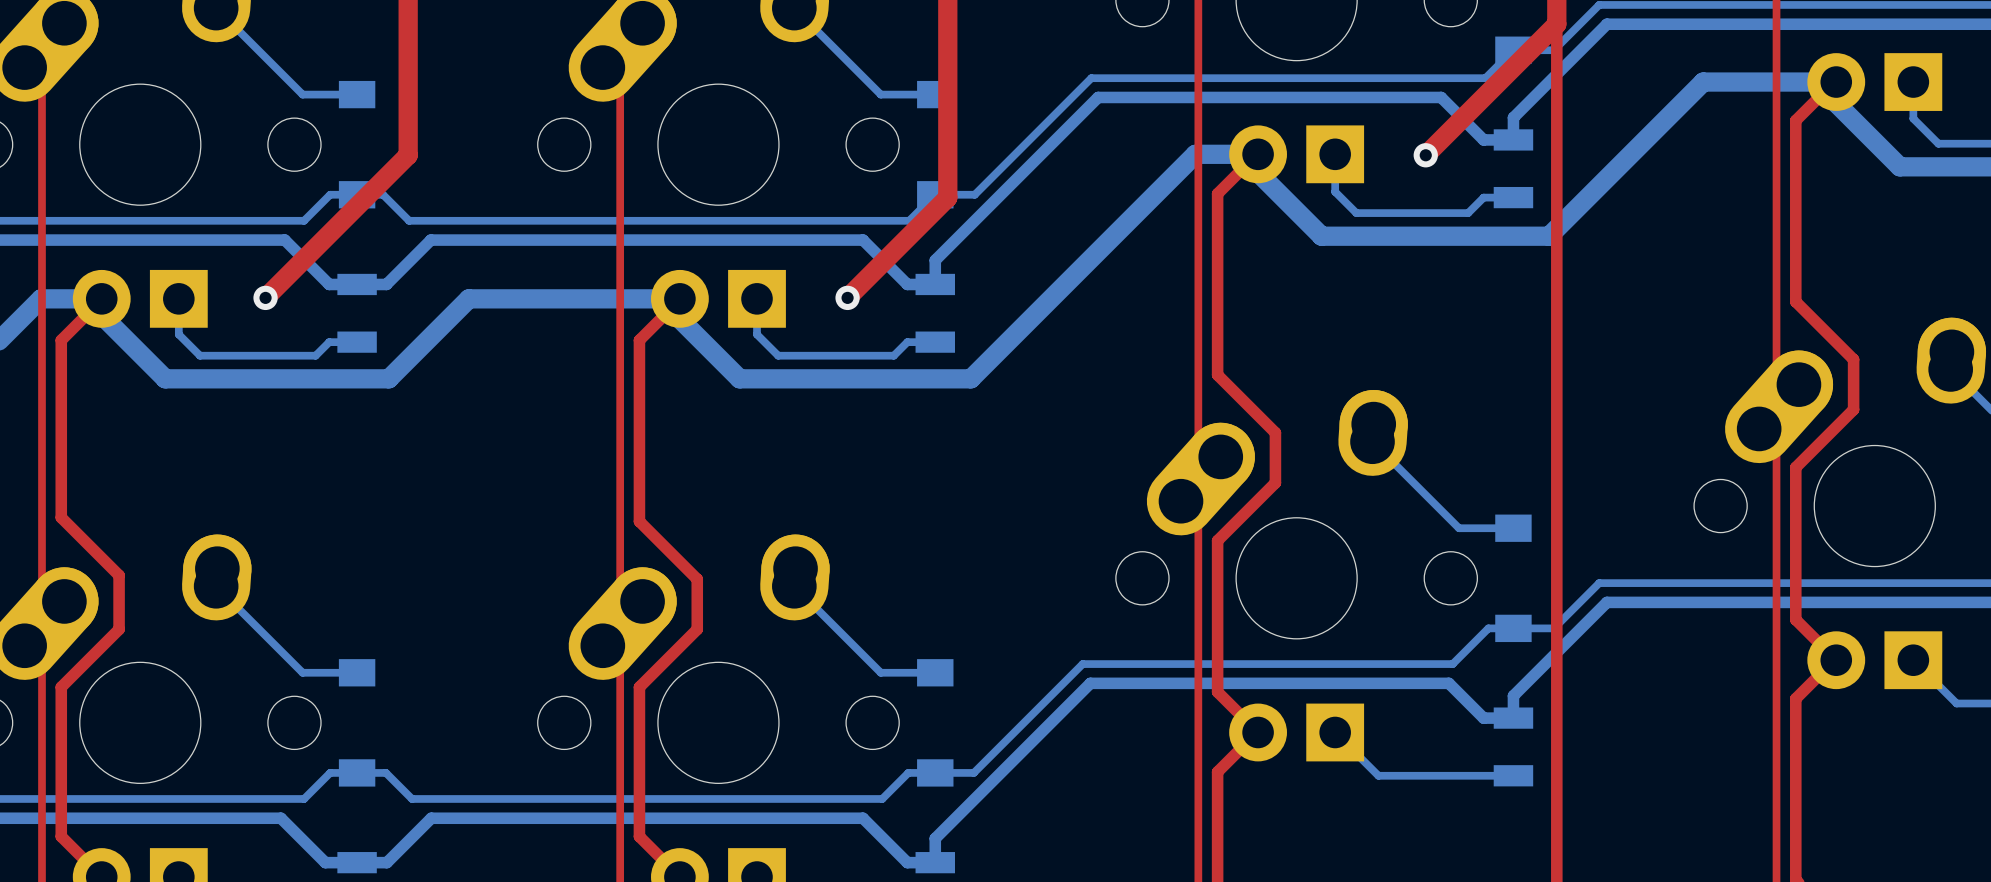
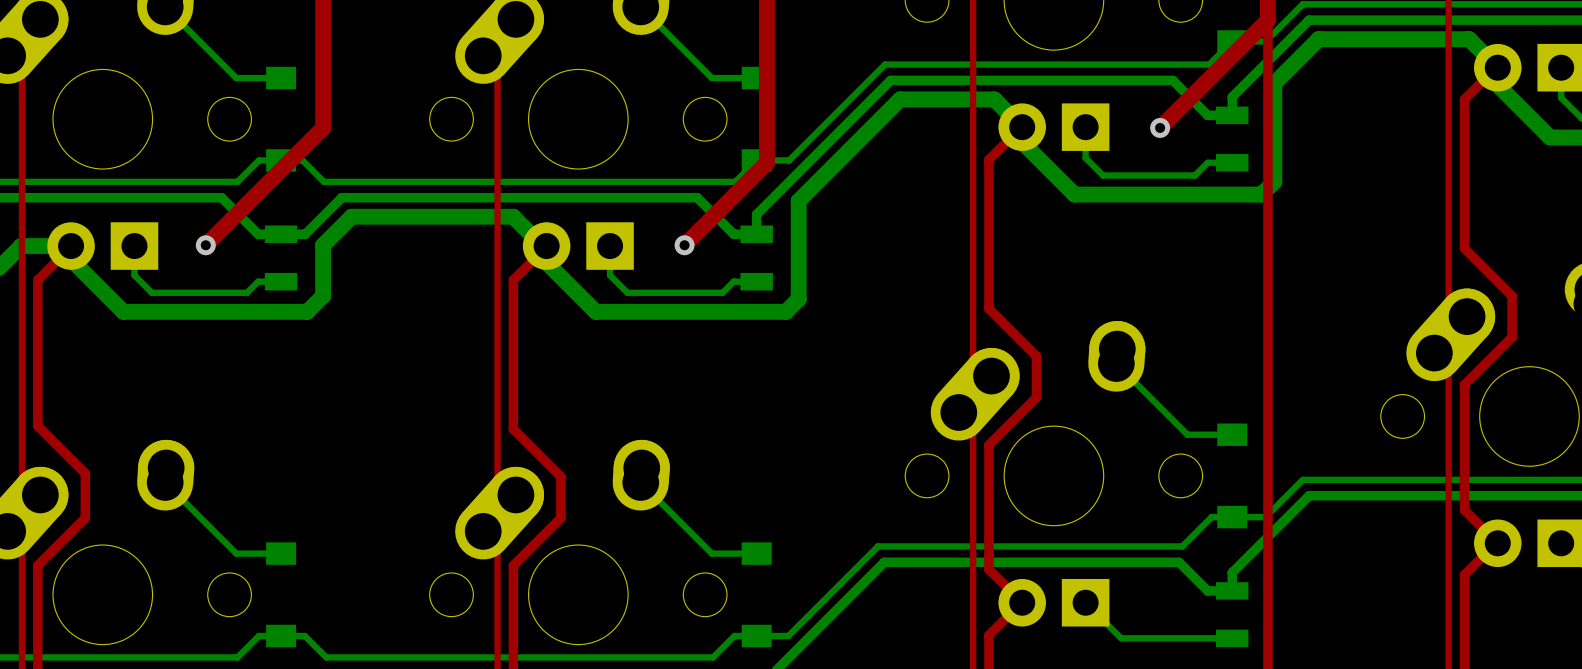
bottom track: (1836, 82) (1703, 82) (1564, 220) -> (1497, 67) (1469, 39) (1318, 39) (1274, 83) (1274, 181)
bottom track: (1258, 154) (1195, 154) (986, 363) -> (1022, 127) (994, 99) (900, 99) (798, 200) (798, 299)
bottom track: (675, 298) (468, 298) (408, 359) -> (542, 246) (513, 216) (351, 216) (323, 245) (323, 295)

